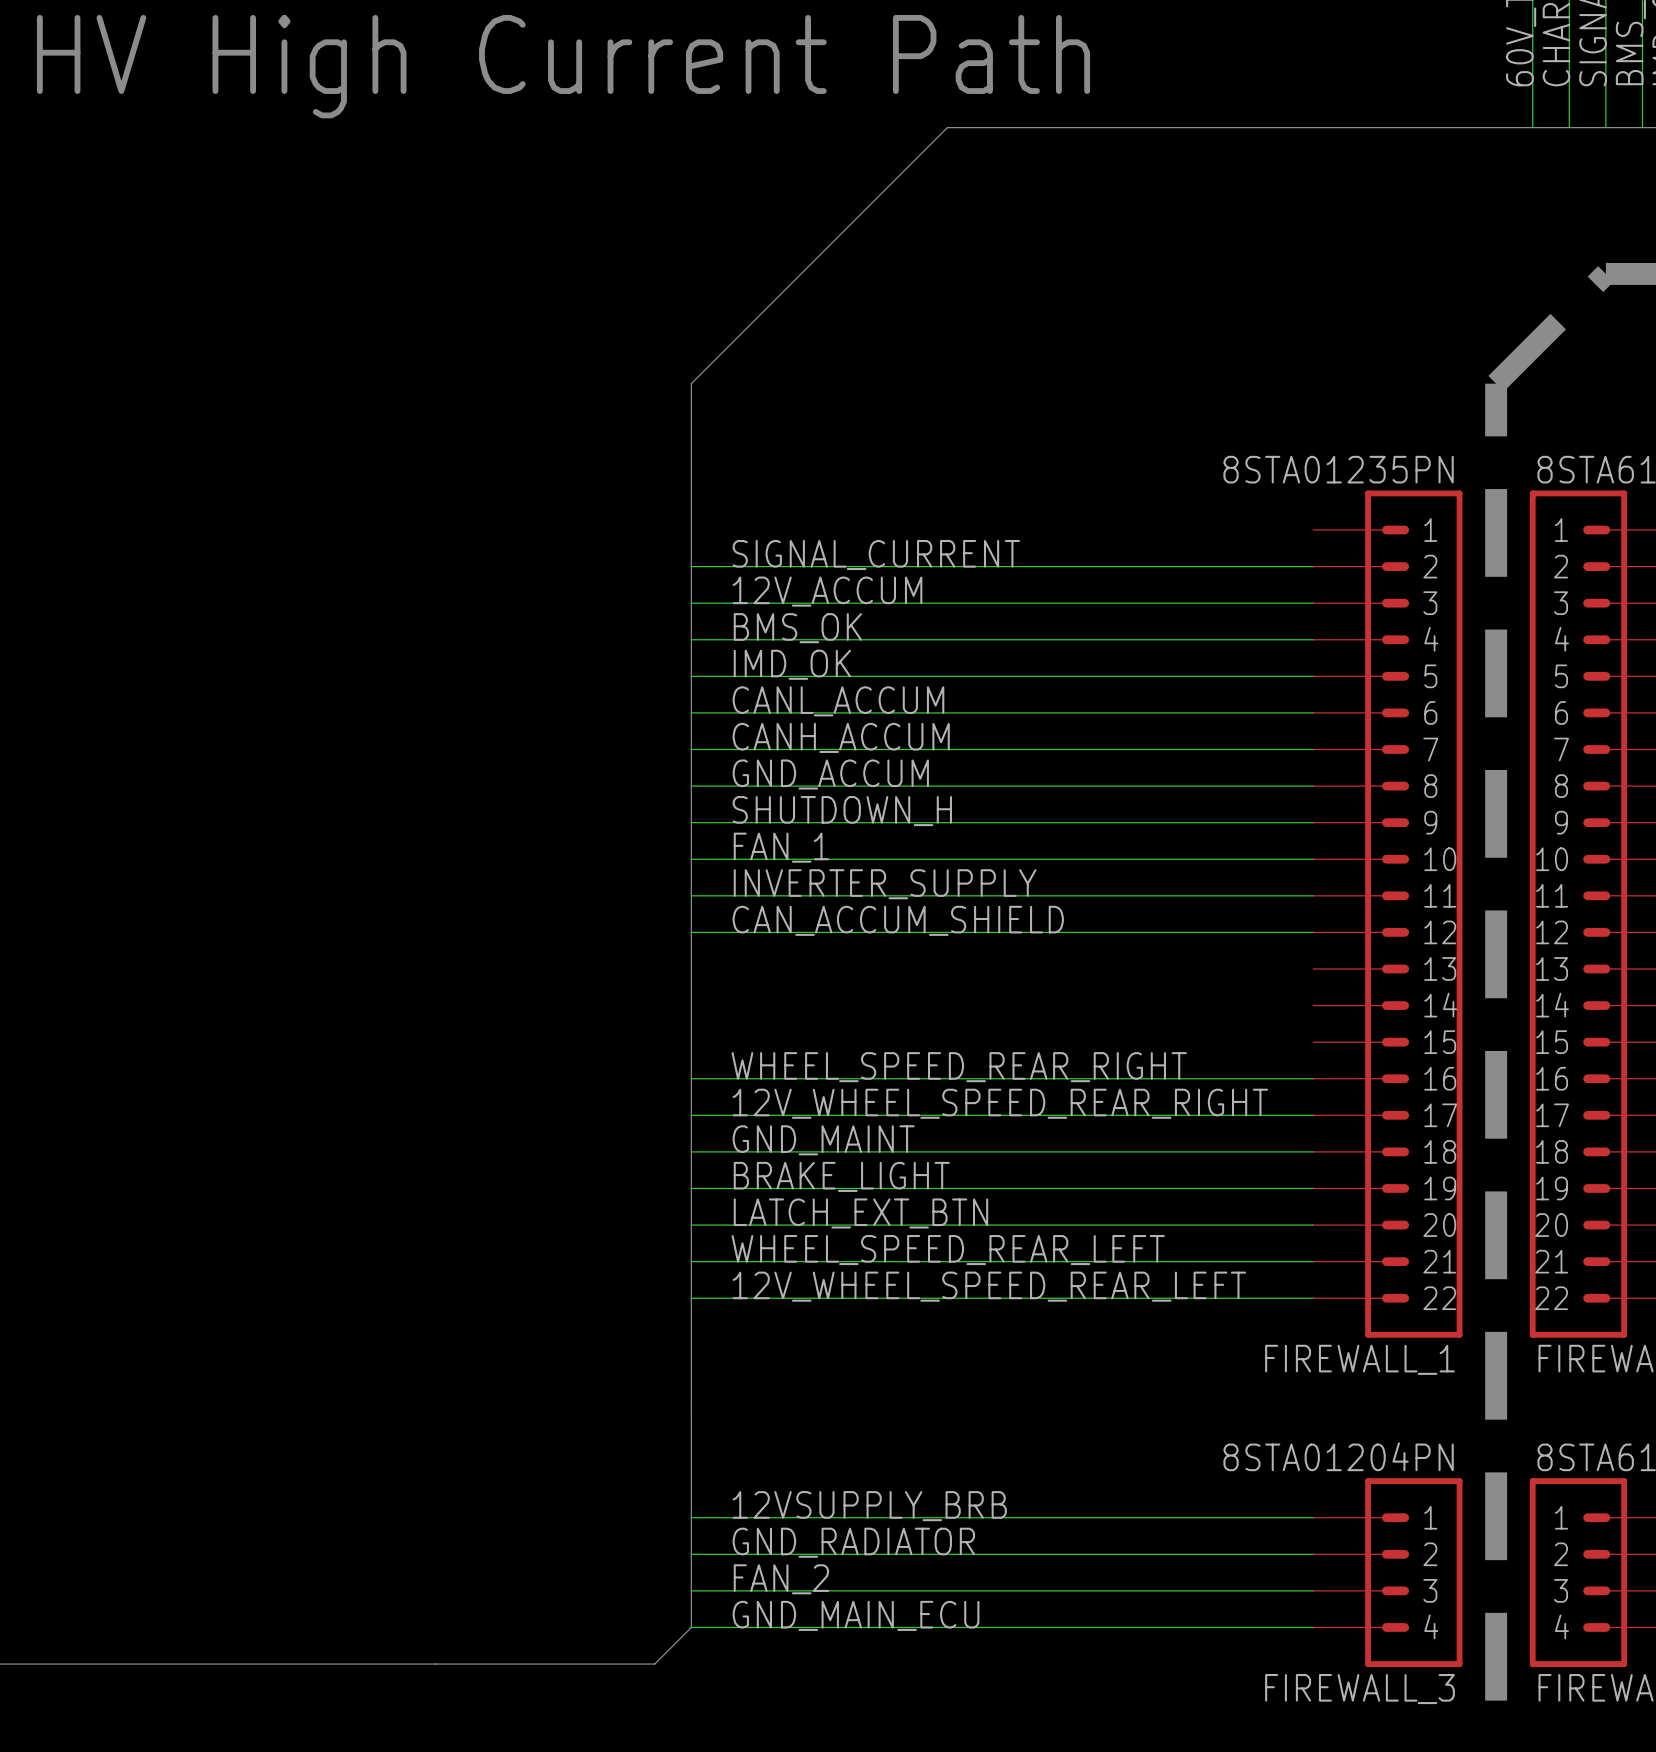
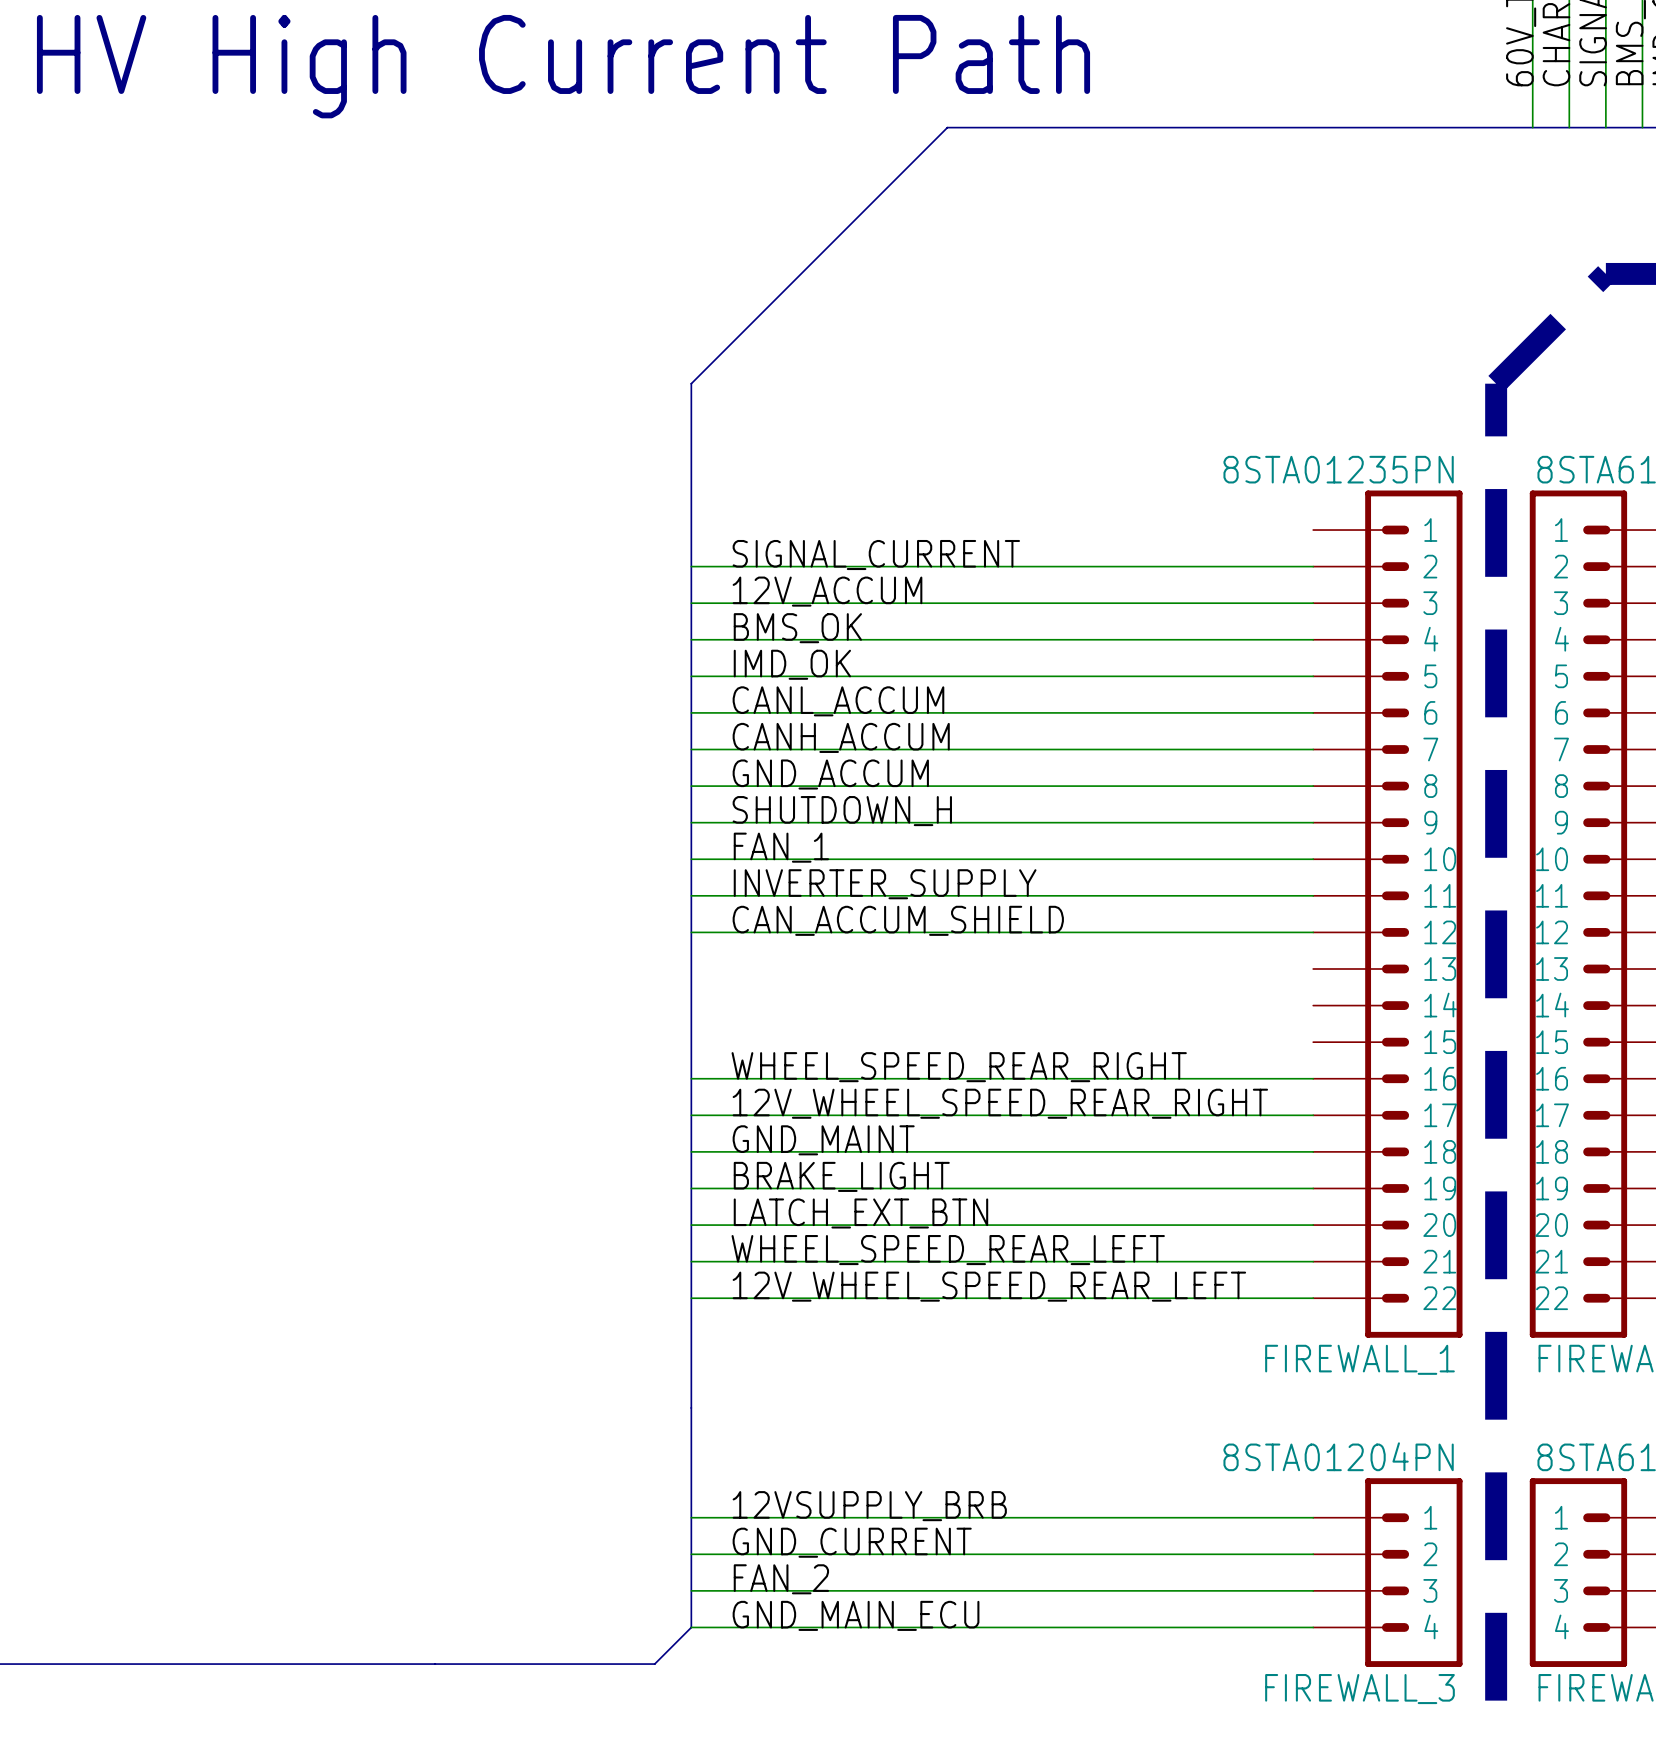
label: GND_RADIATOR (853, 1542) -> GND_CURRENT (852, 1542)

